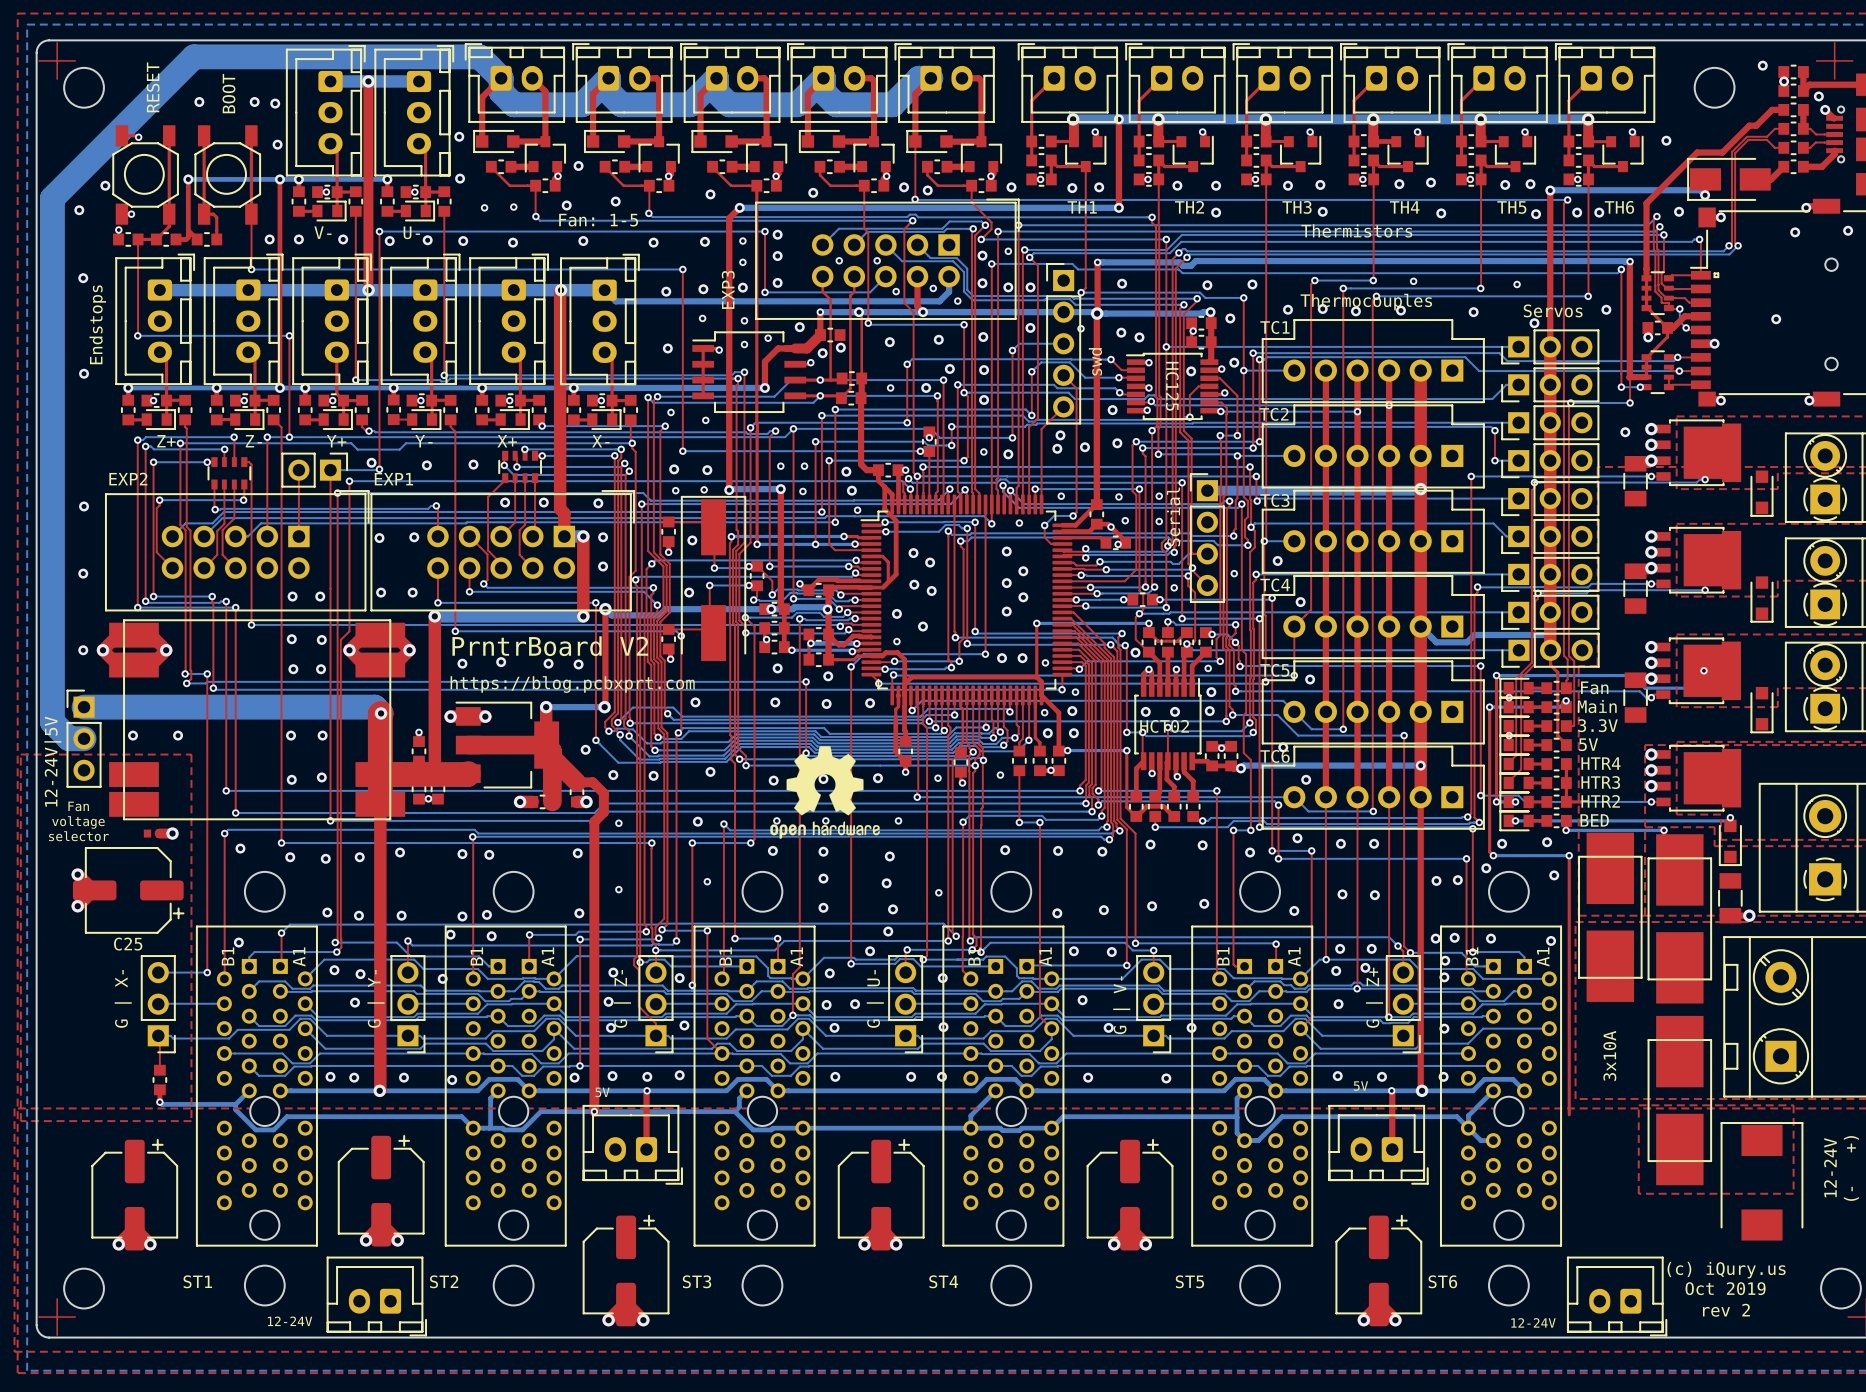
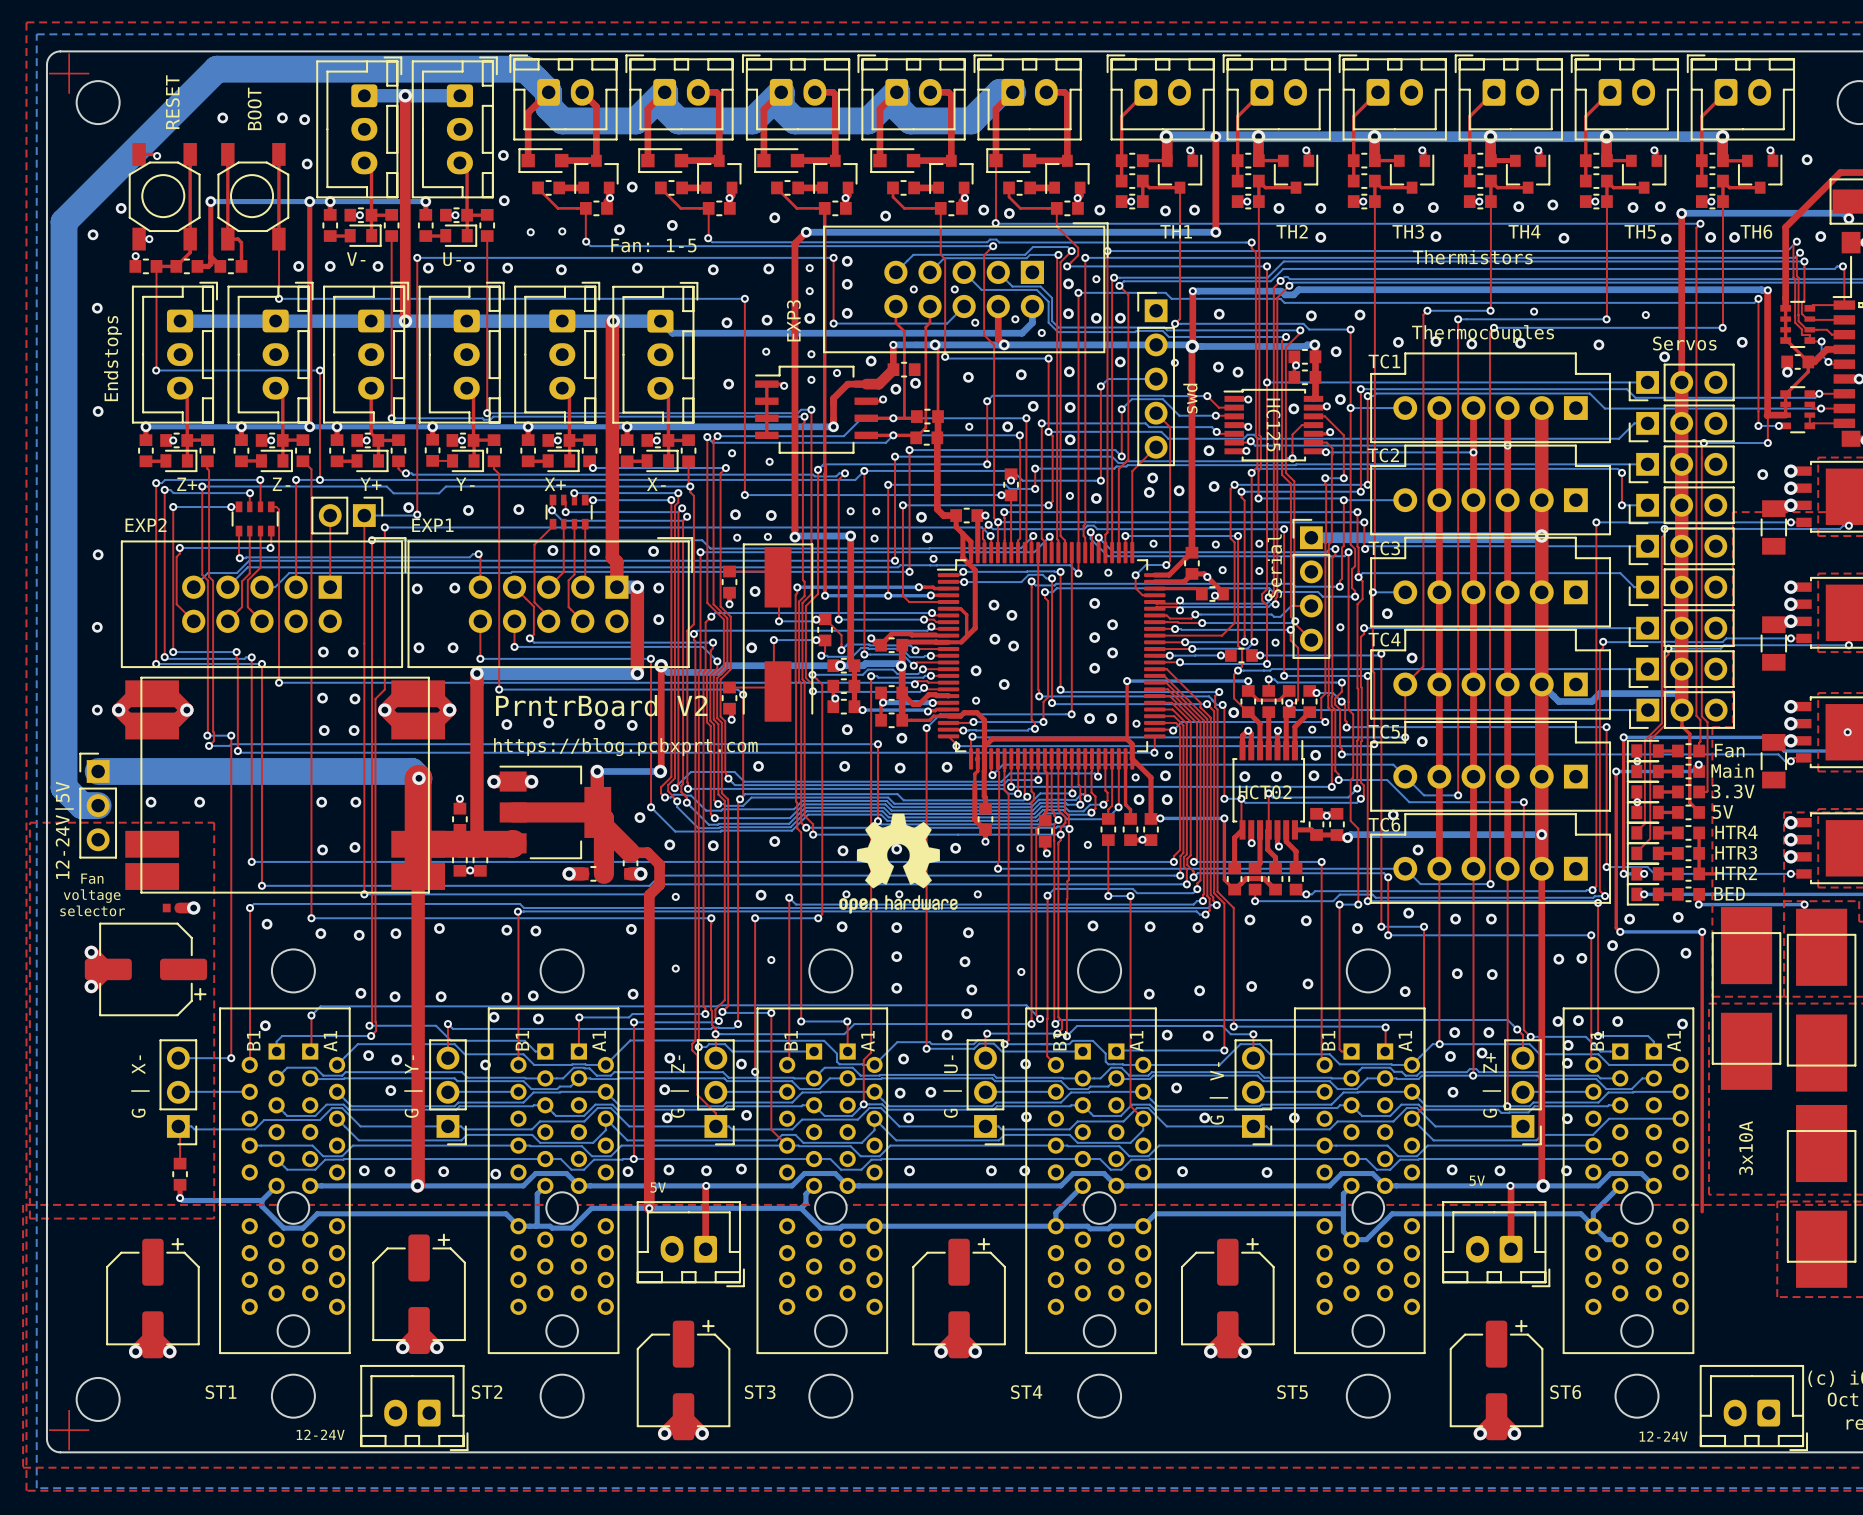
C25: (128, 890) -> none
part: none -> (145, 969)

